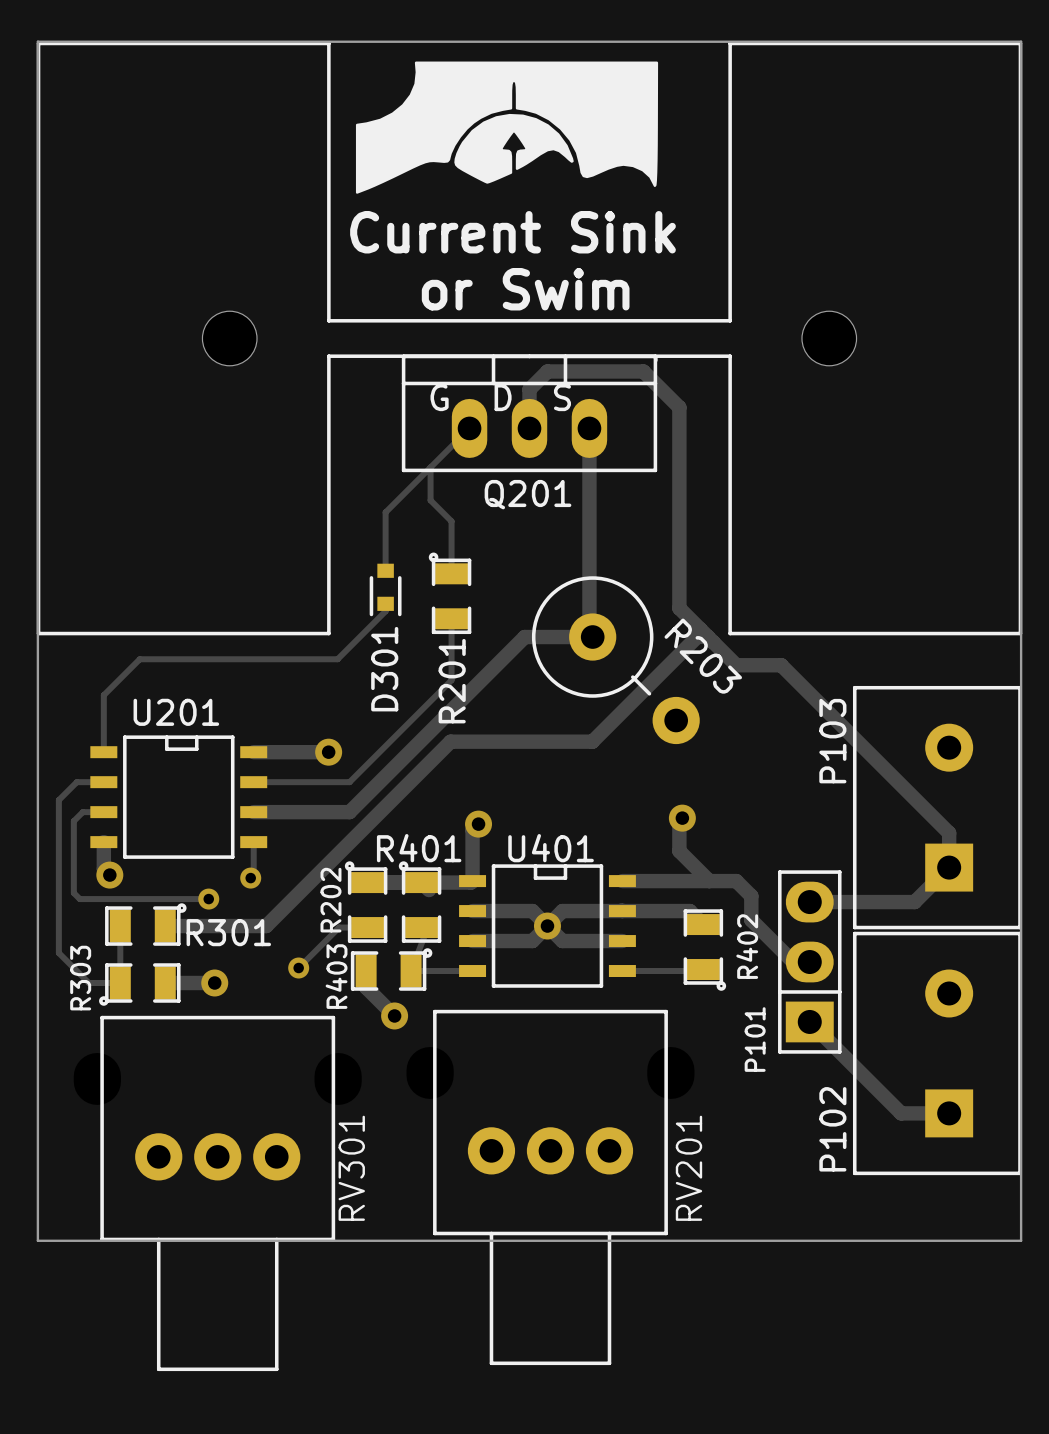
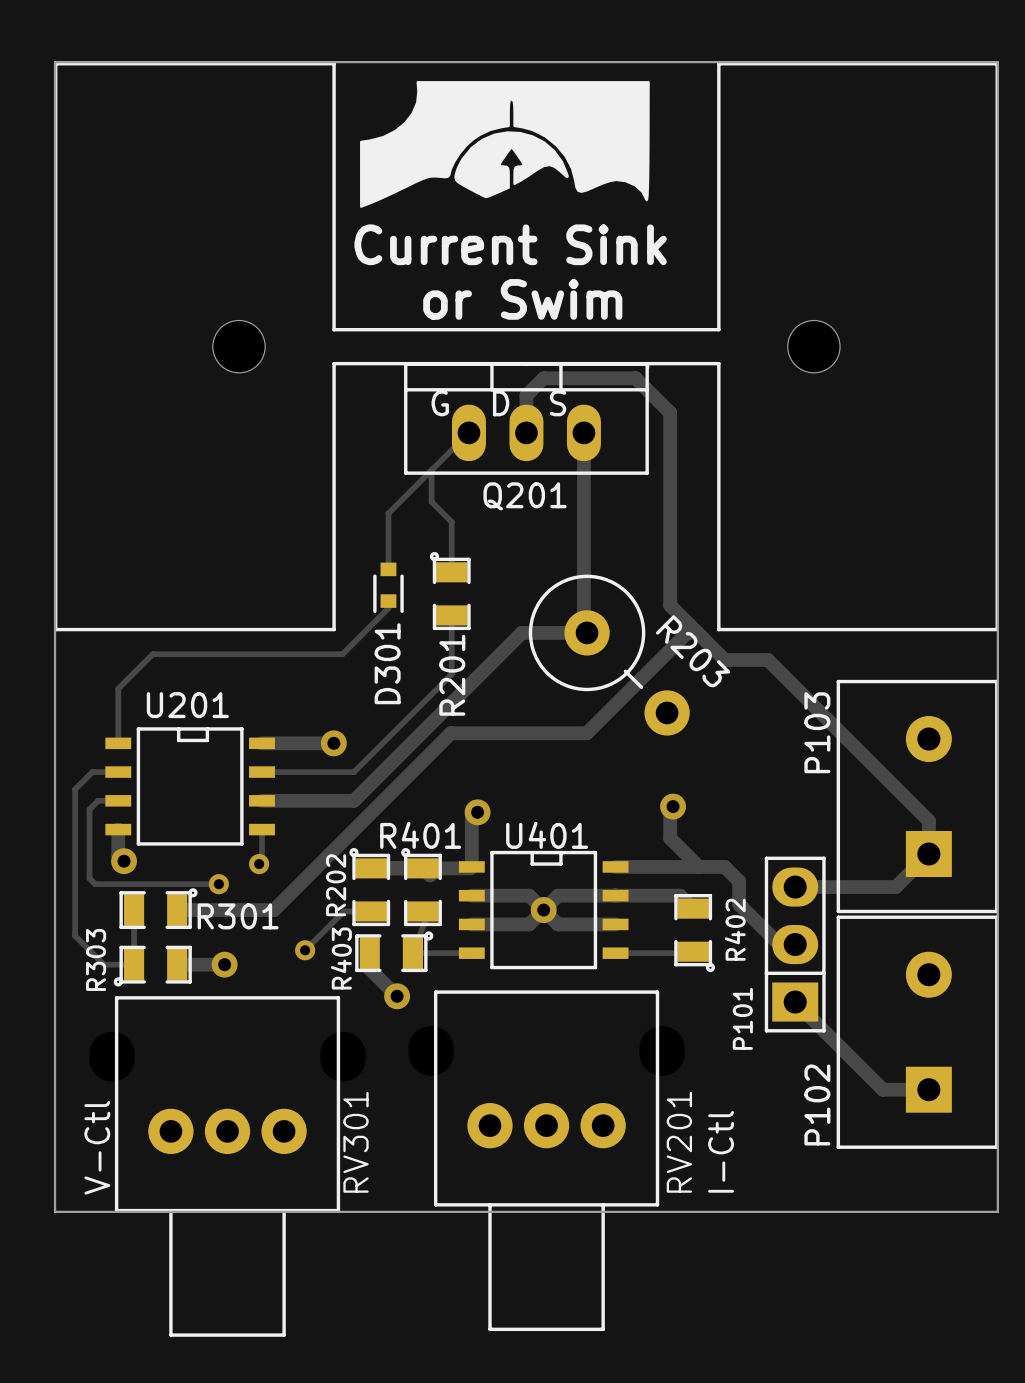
text: none -> V-Ctl (97, 1147)
text: none -> I-Ctl (721, 1151)

